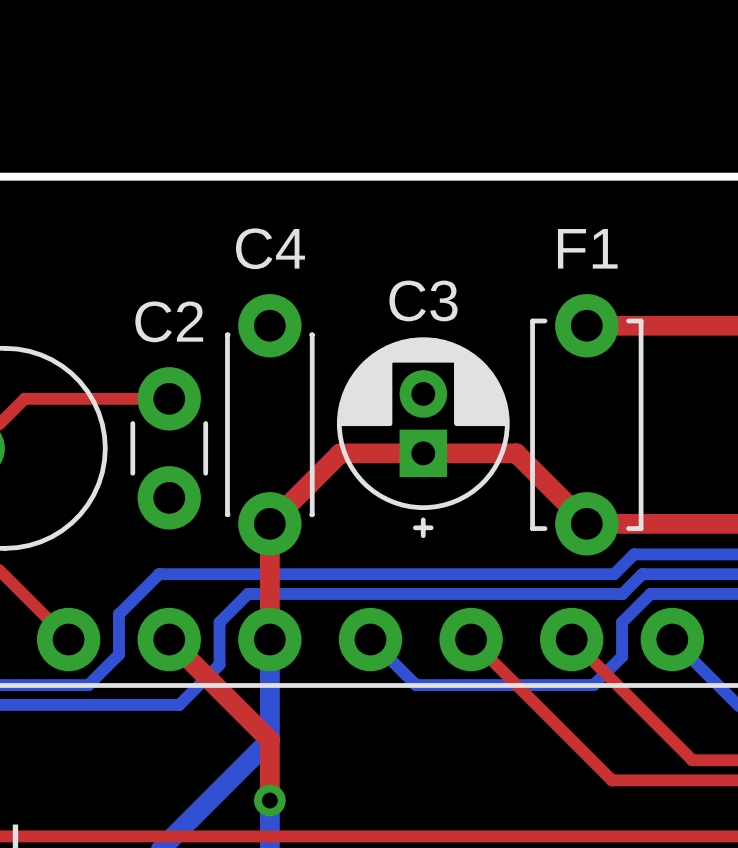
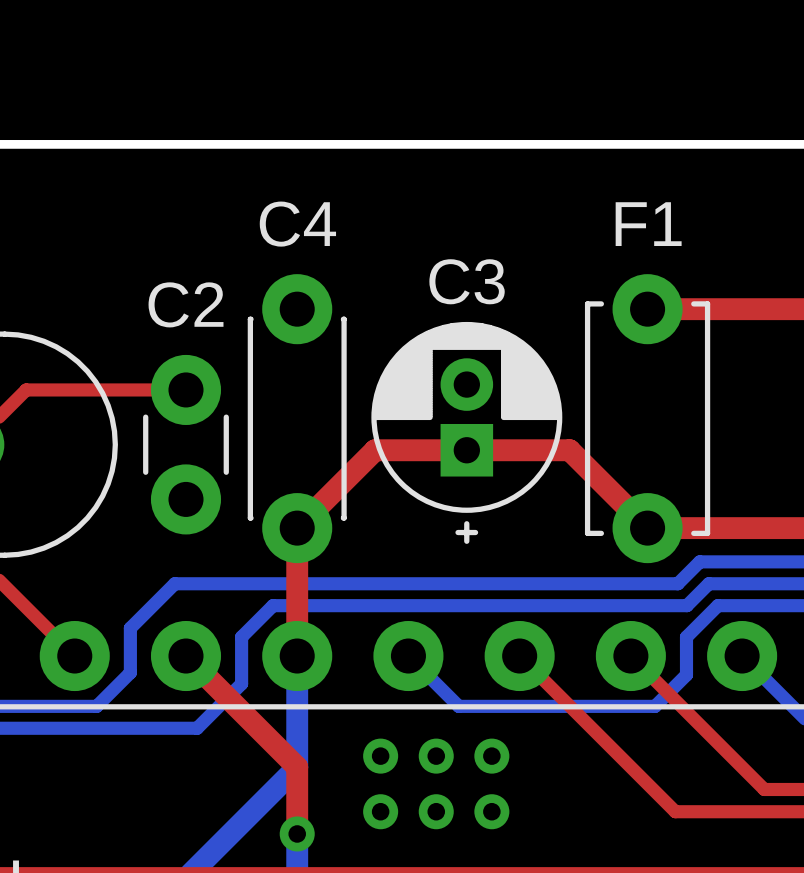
via: none -> (380, 756)
via: none -> (436, 756)
via: none -> (491, 756)
via: none -> (380, 811)
via: none -> (436, 811)
via: none -> (491, 811)

